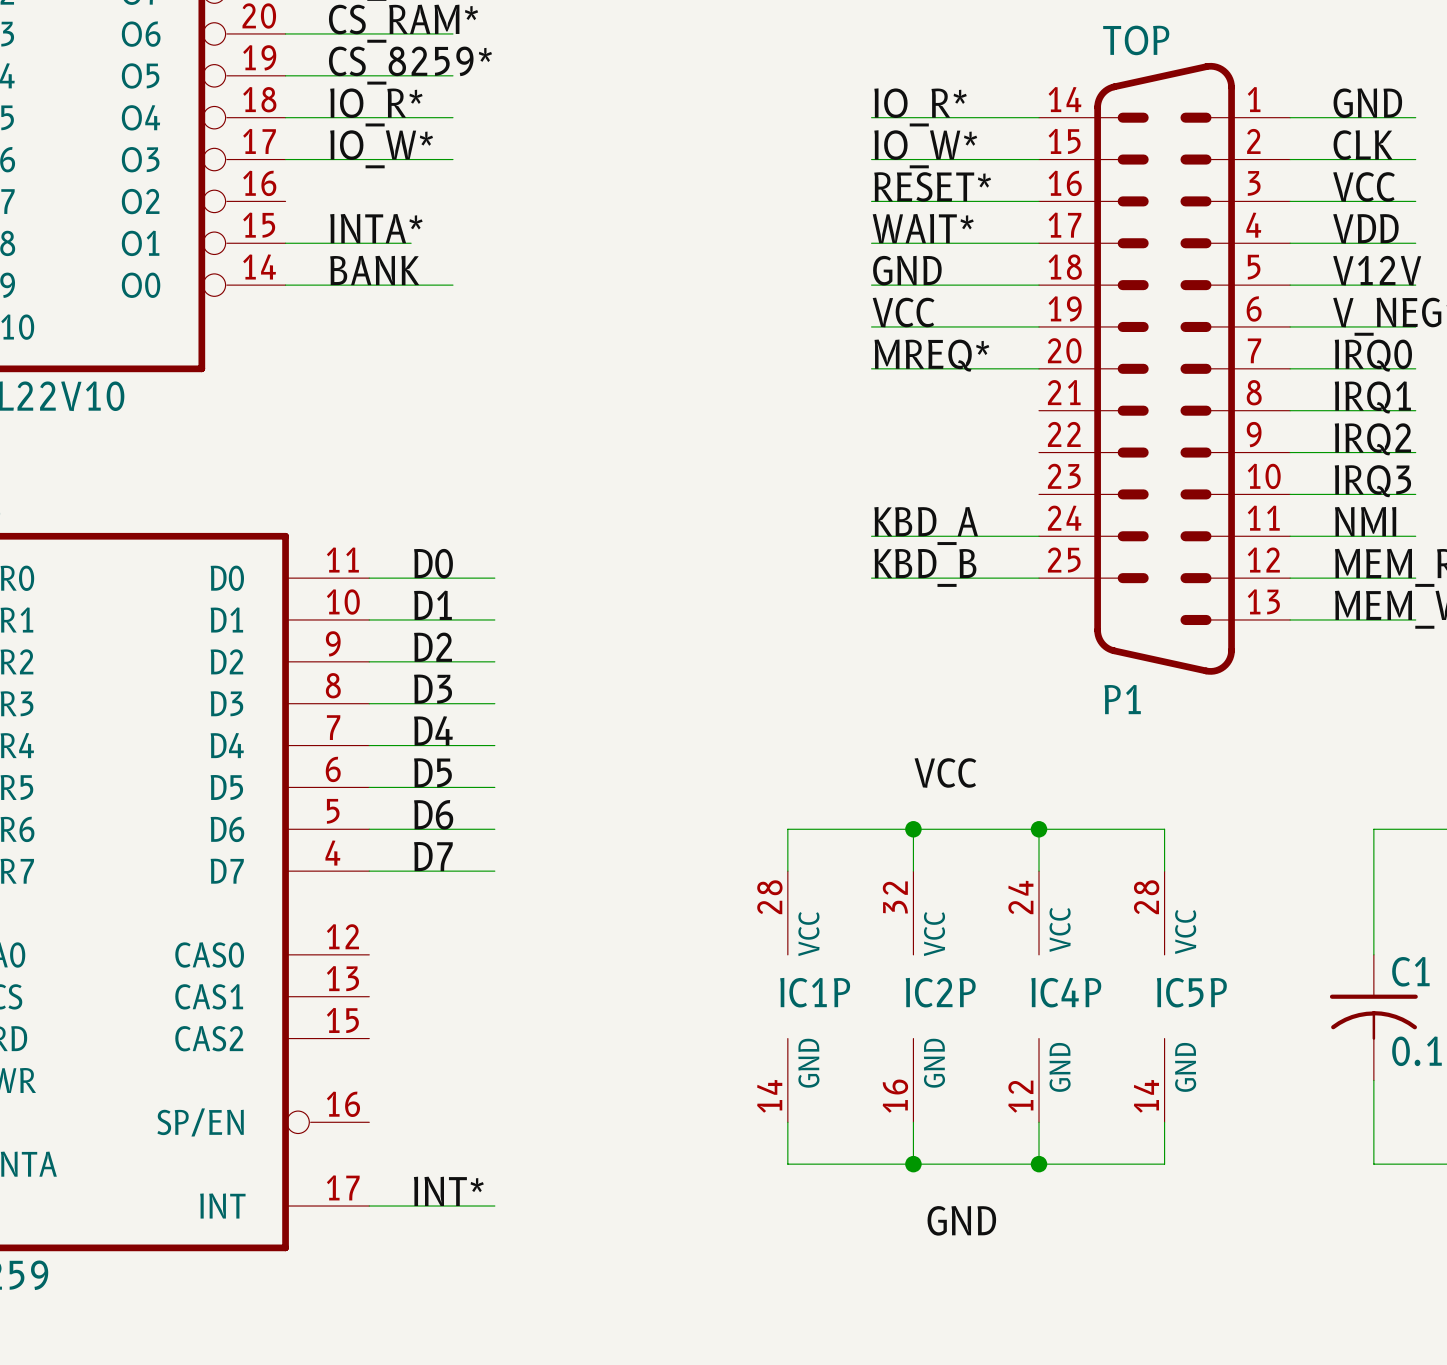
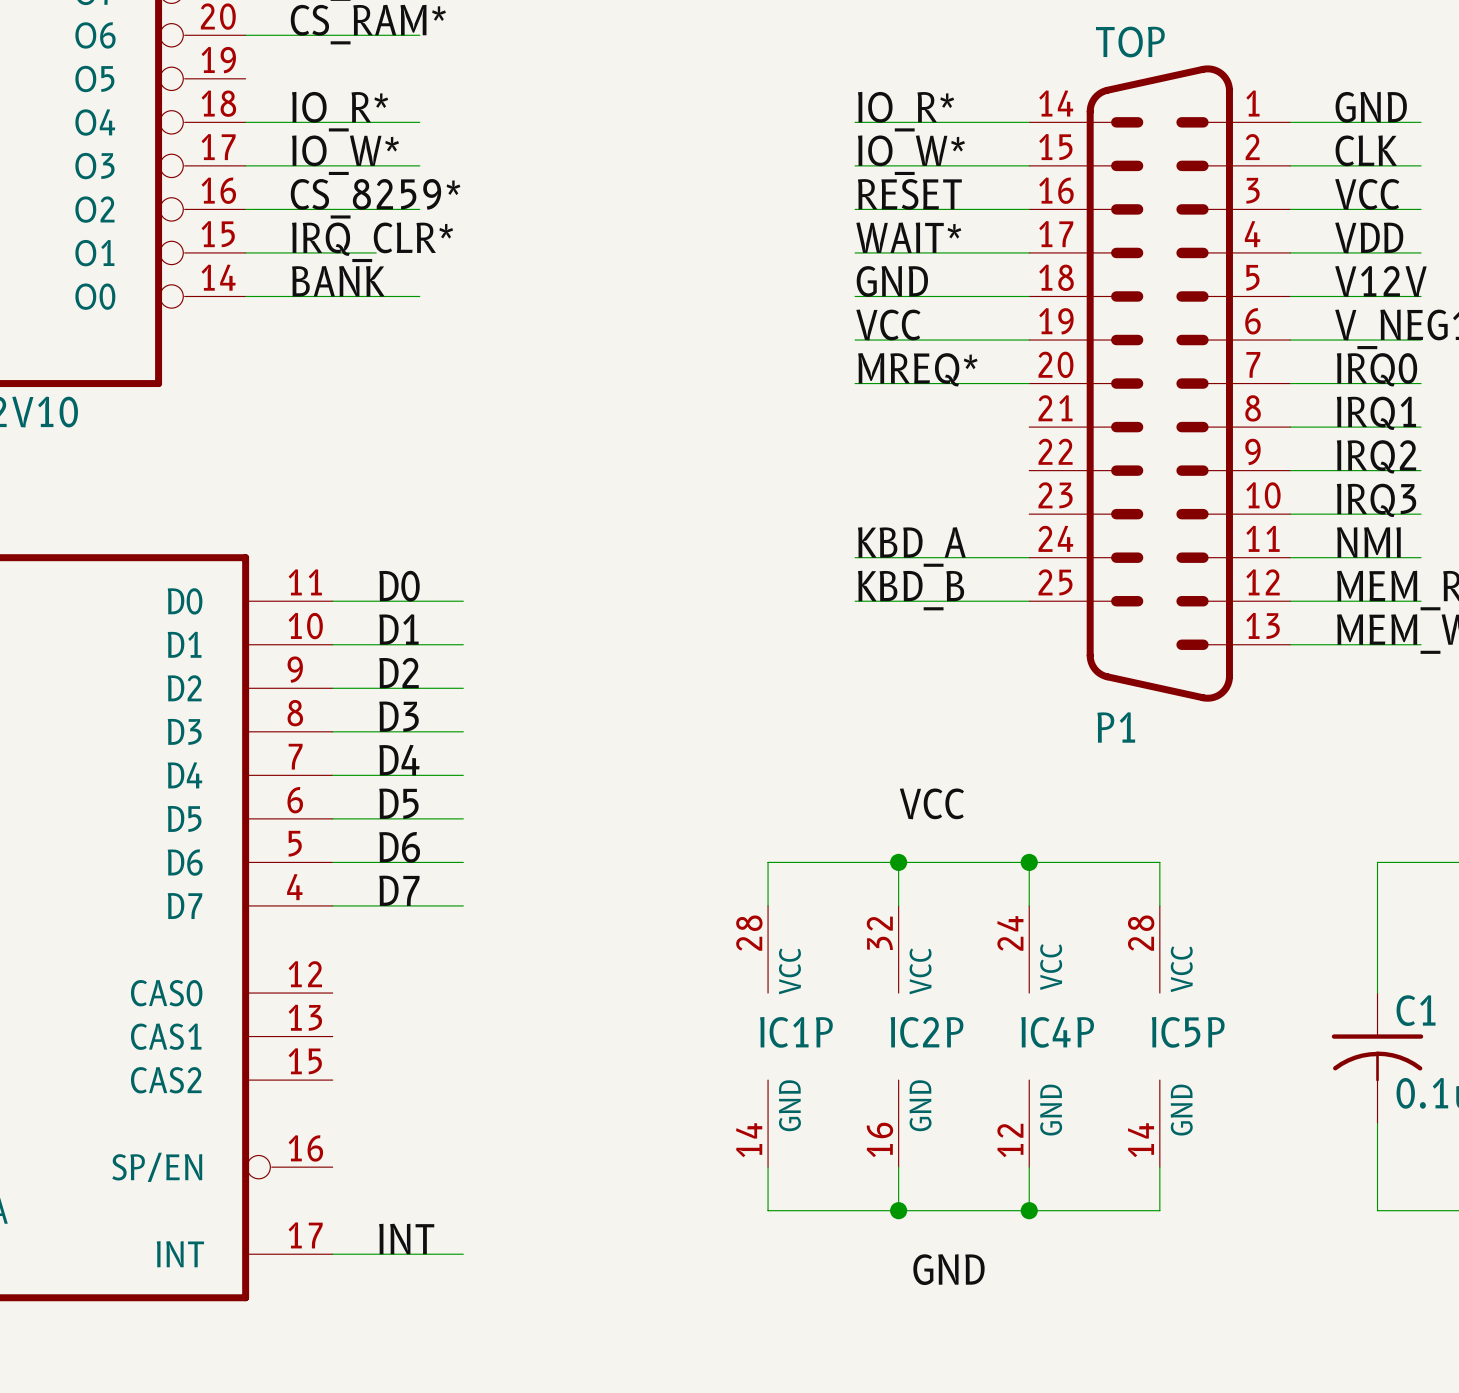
label position: CS_8259* (410, 65) -> CS_8259* (375, 198)
wire: (285, 75) (452, 75) -> (245, 209) (419, 209)
label: RESET* (932, 186) -> RESET (909, 194)
label: INTA* (376, 228) -> IRQ_CLR* (372, 242)
label: INT* (448, 1191) -> INT (406, 1238)

